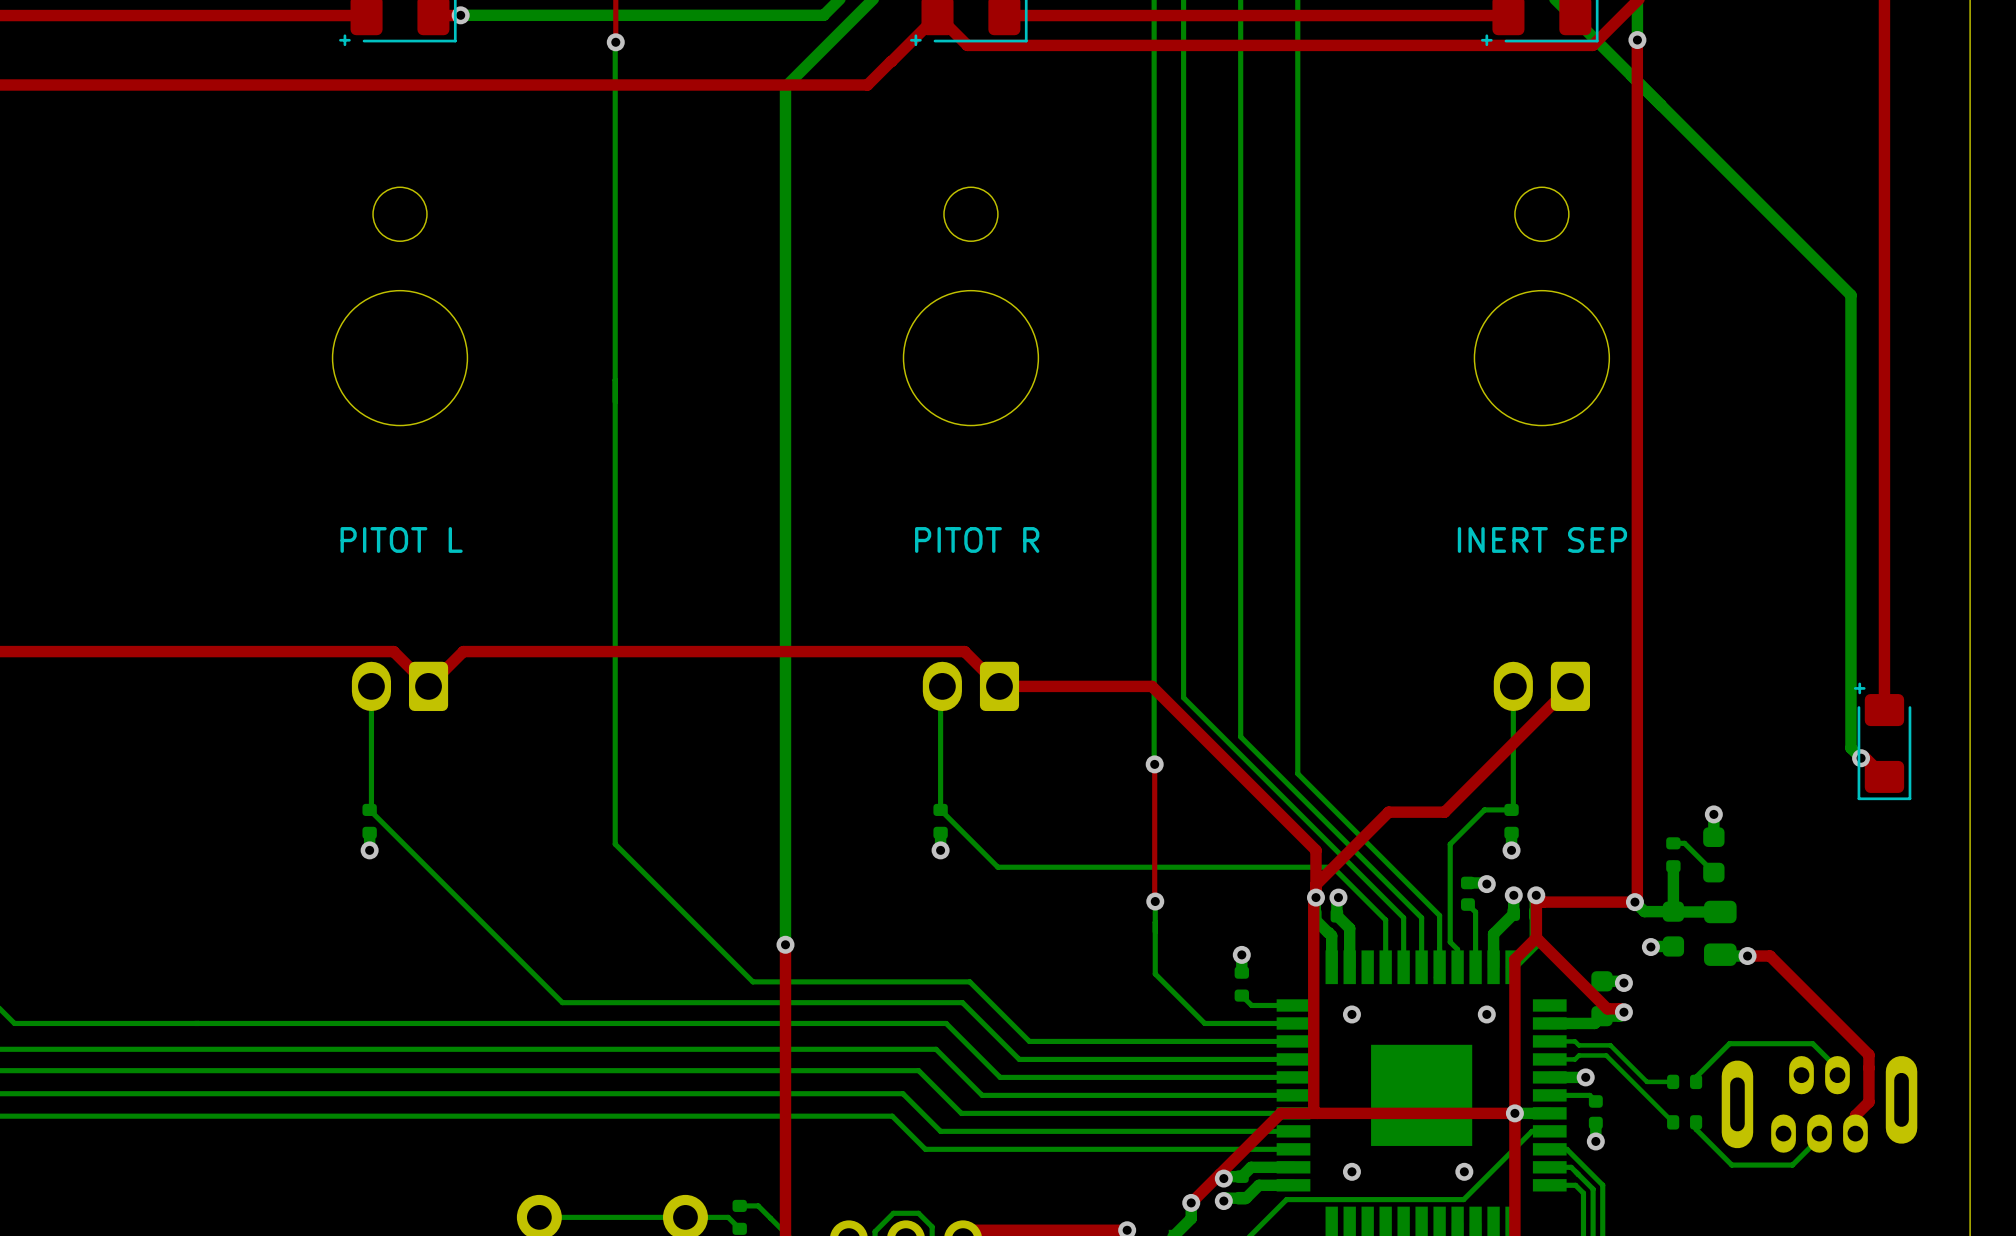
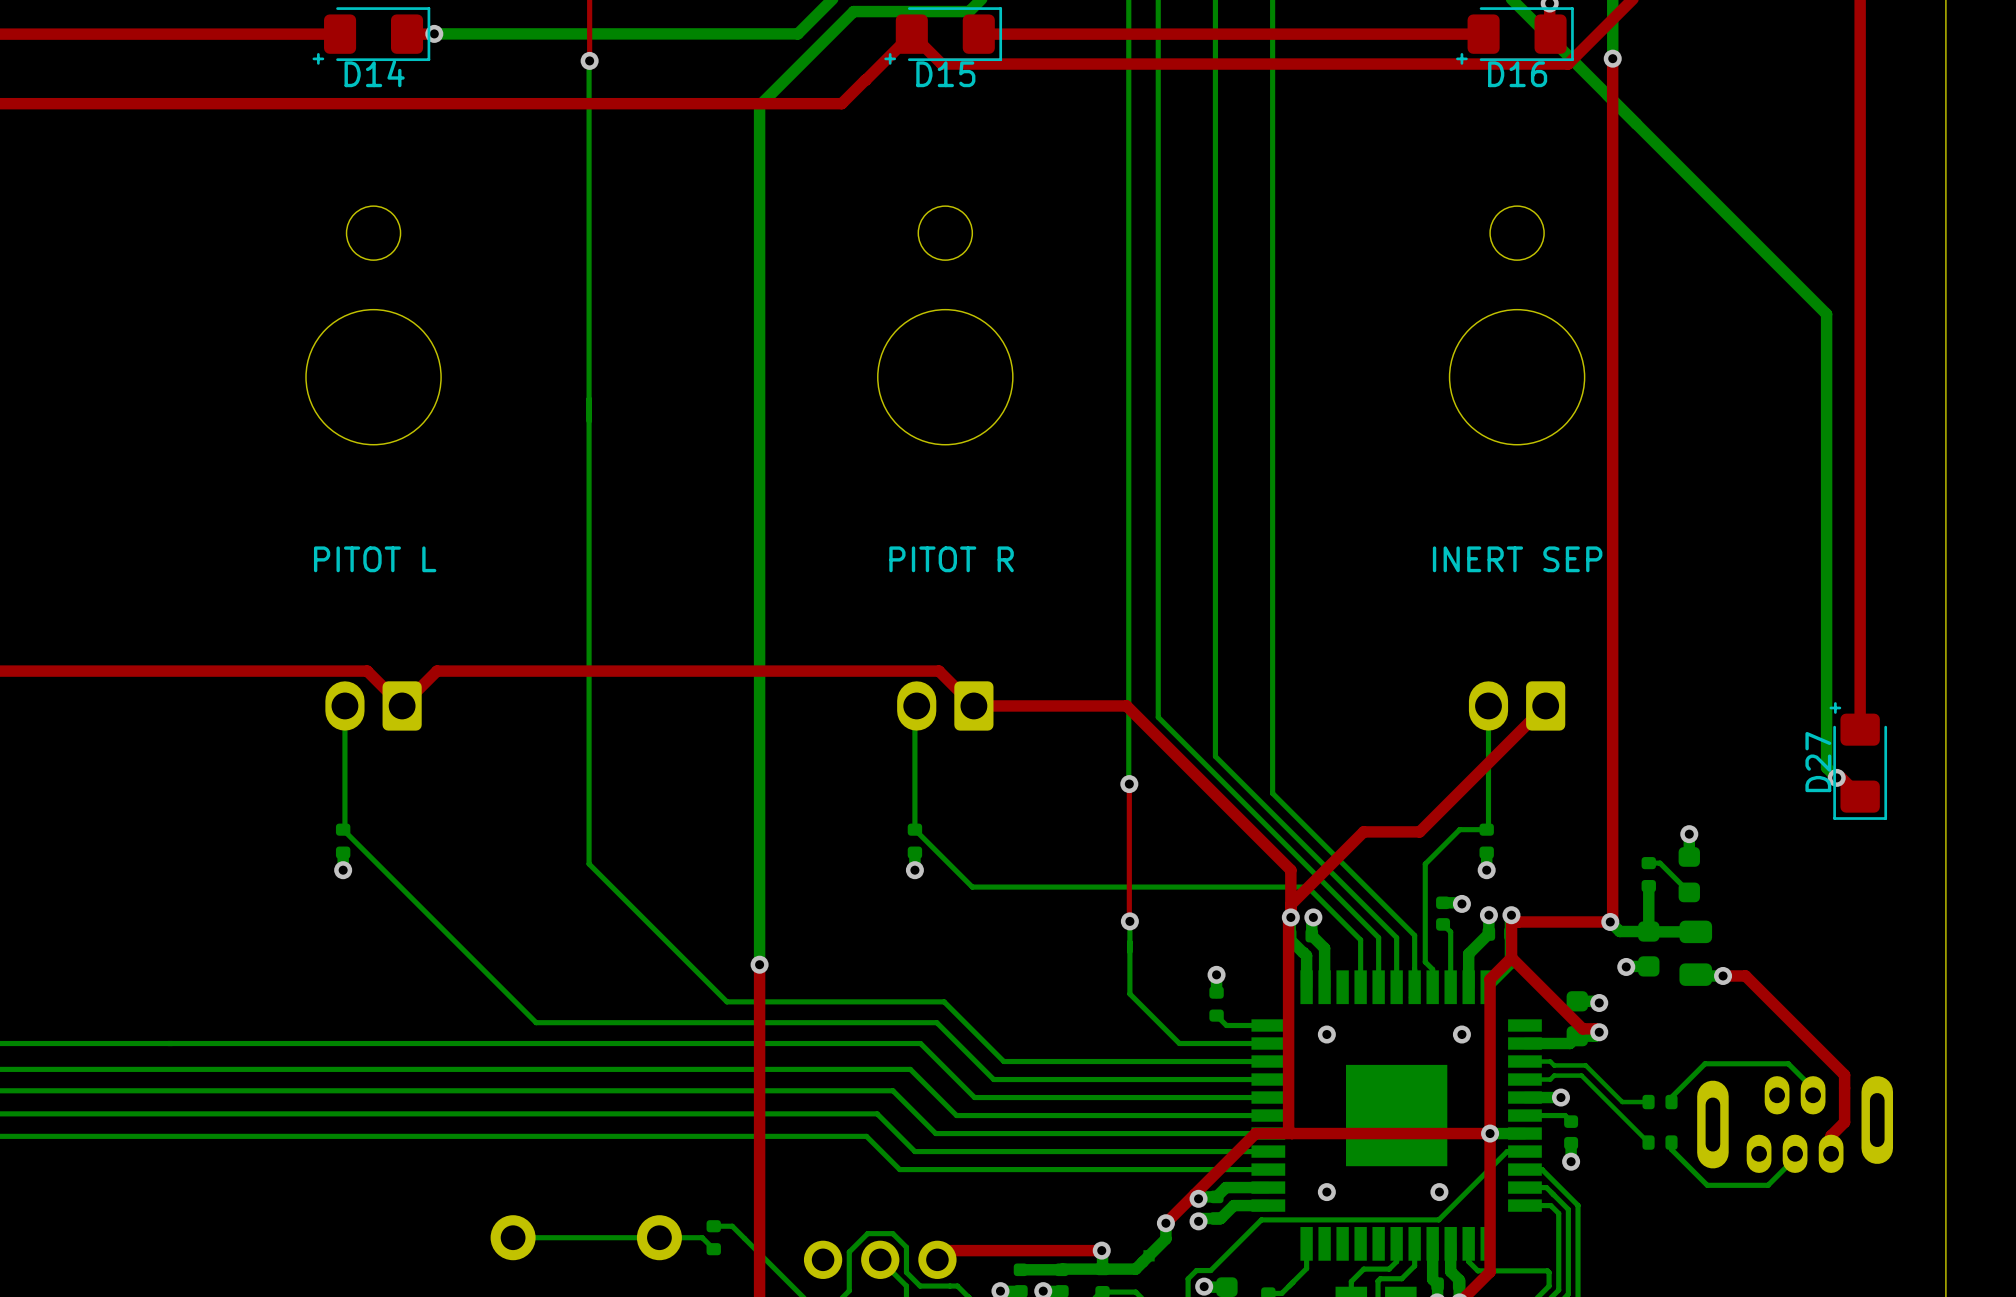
D14 name: none -> D14 (374, 73)
D15 name: none -> D15 (945, 74)
D16 name: none -> D16 (1517, 74)
D27 name: none -> D27 (1818, 762)

